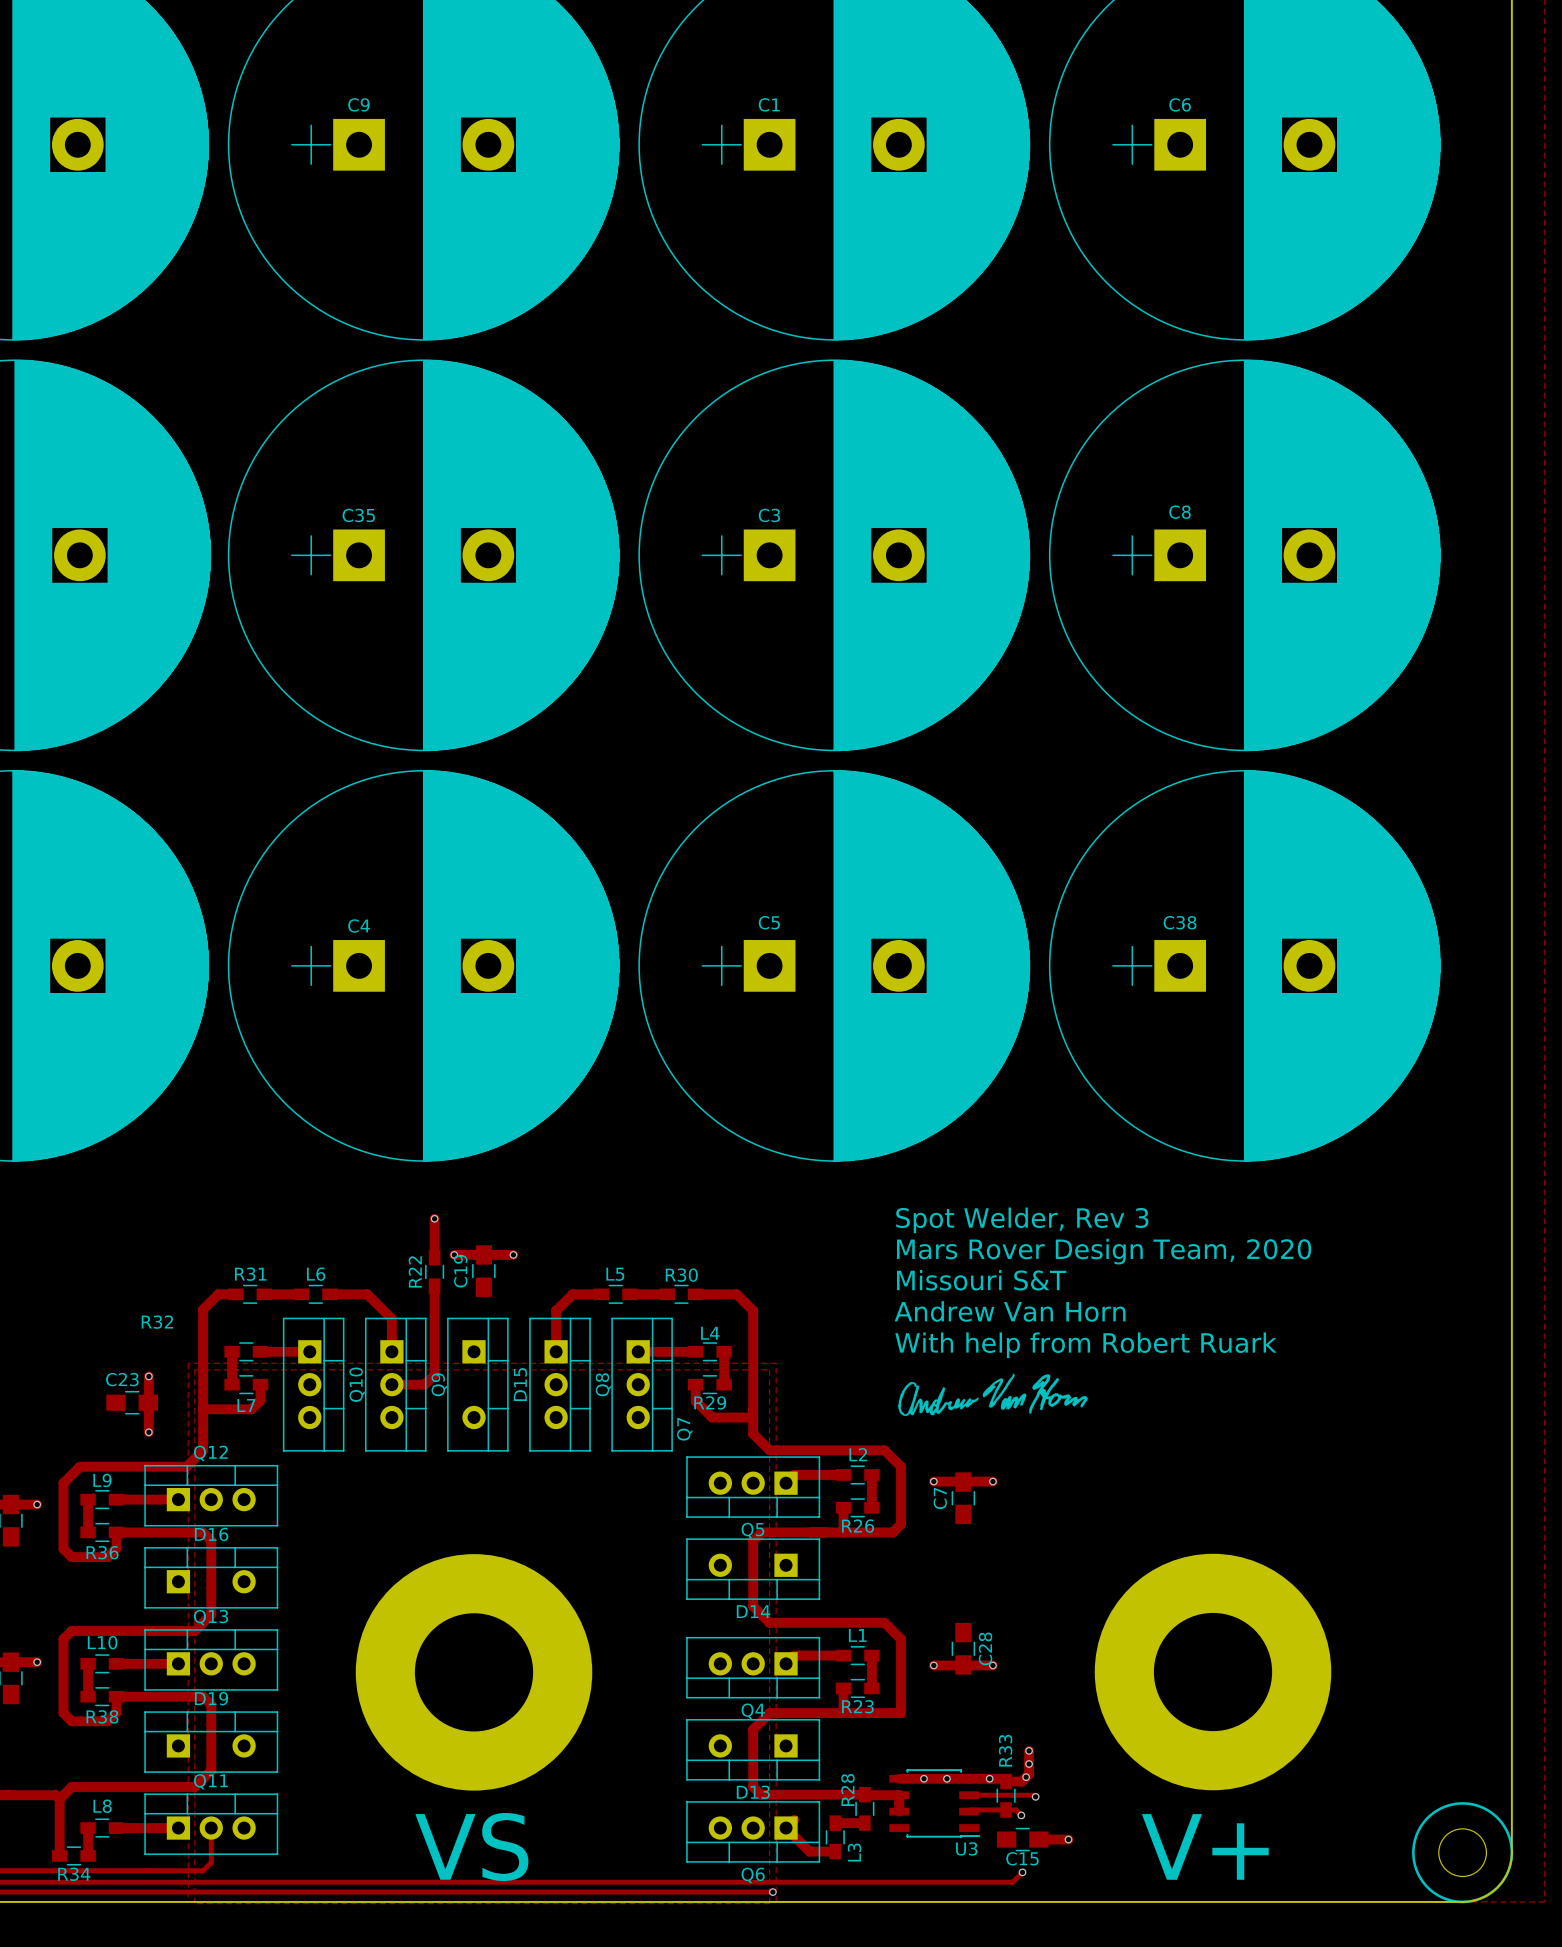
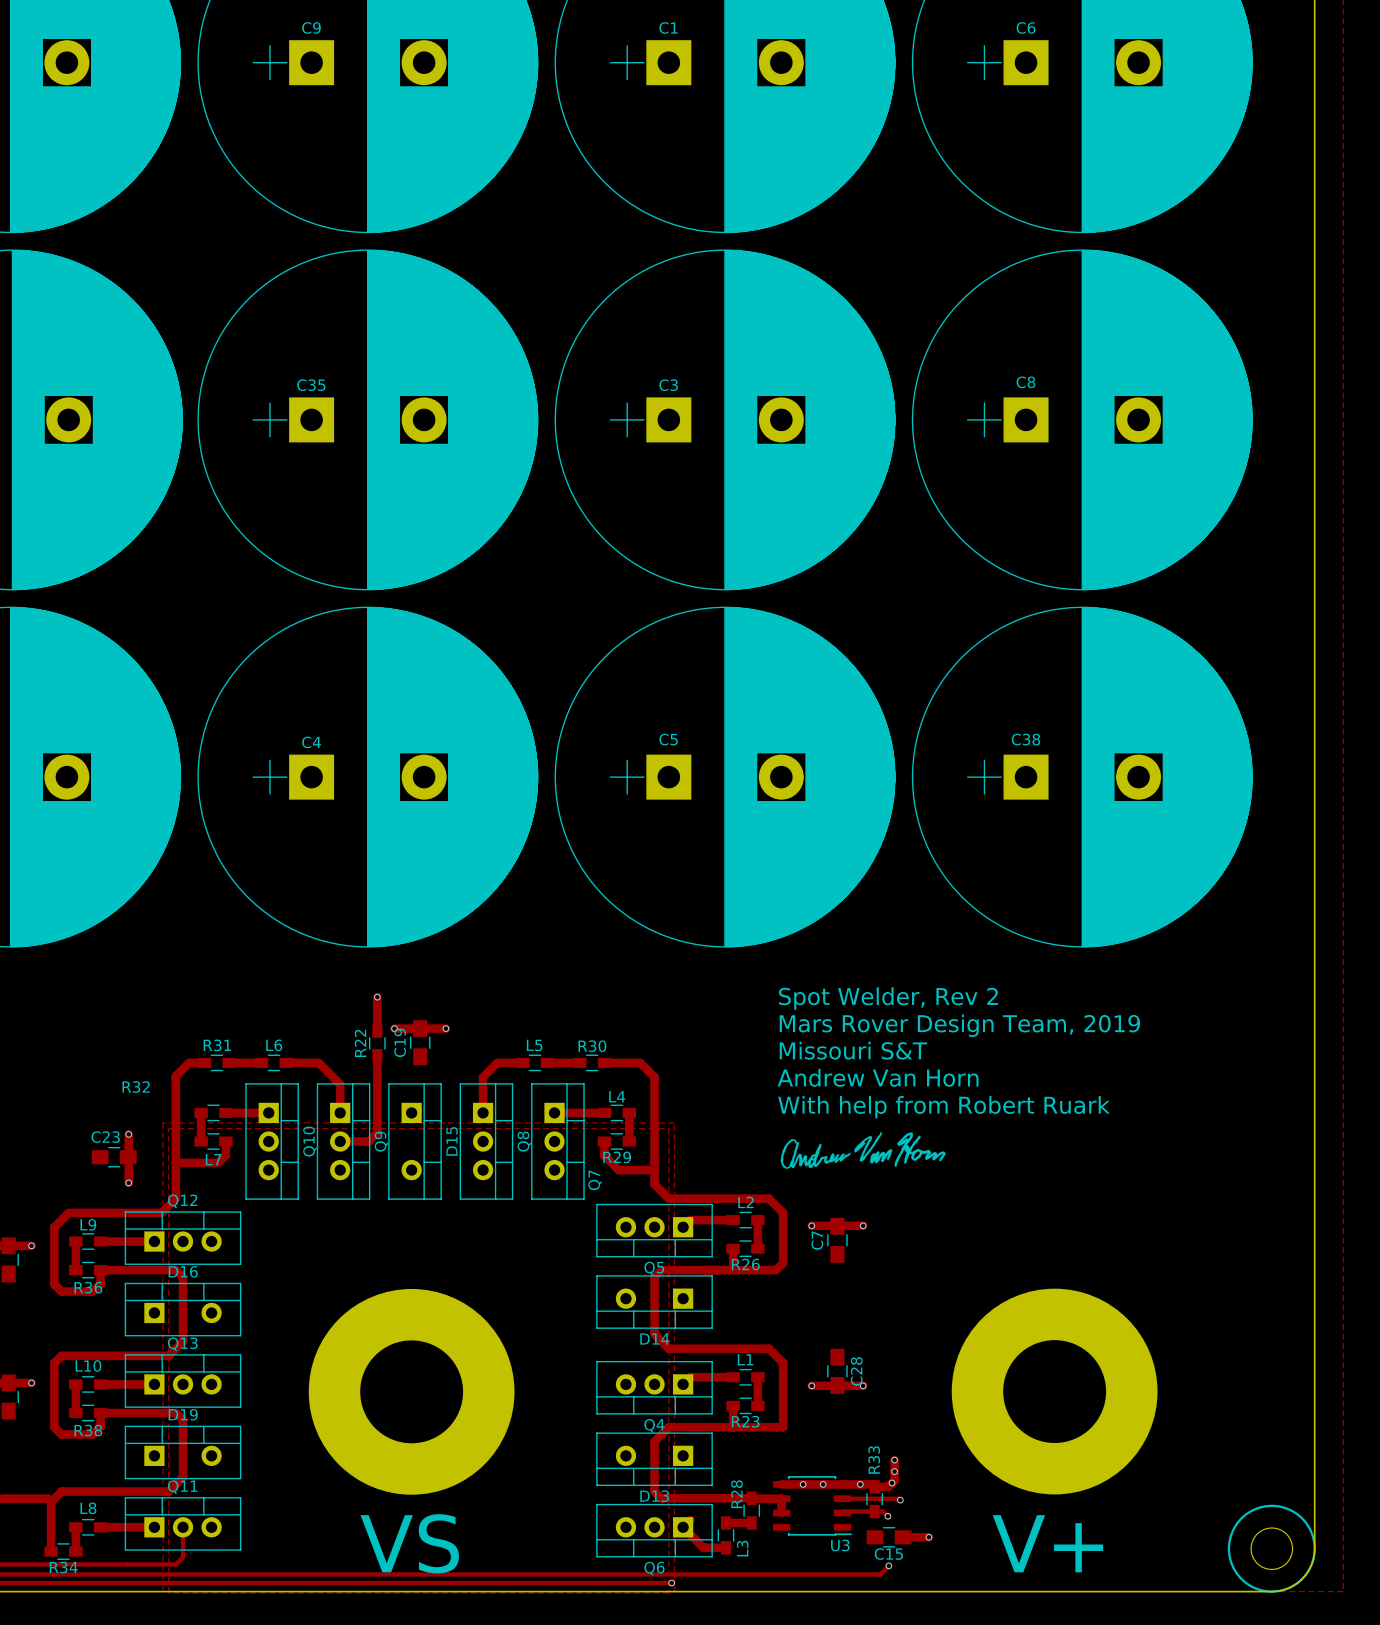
text: Spot Welder, Rev 3 (1022, 1220) -> Spot Welder, Rev 2 (888, 998)
text: Mars Rover Design Team, 2020 (1104, 1251) -> Mars Rover Design Team, 2019 (959, 1025)

